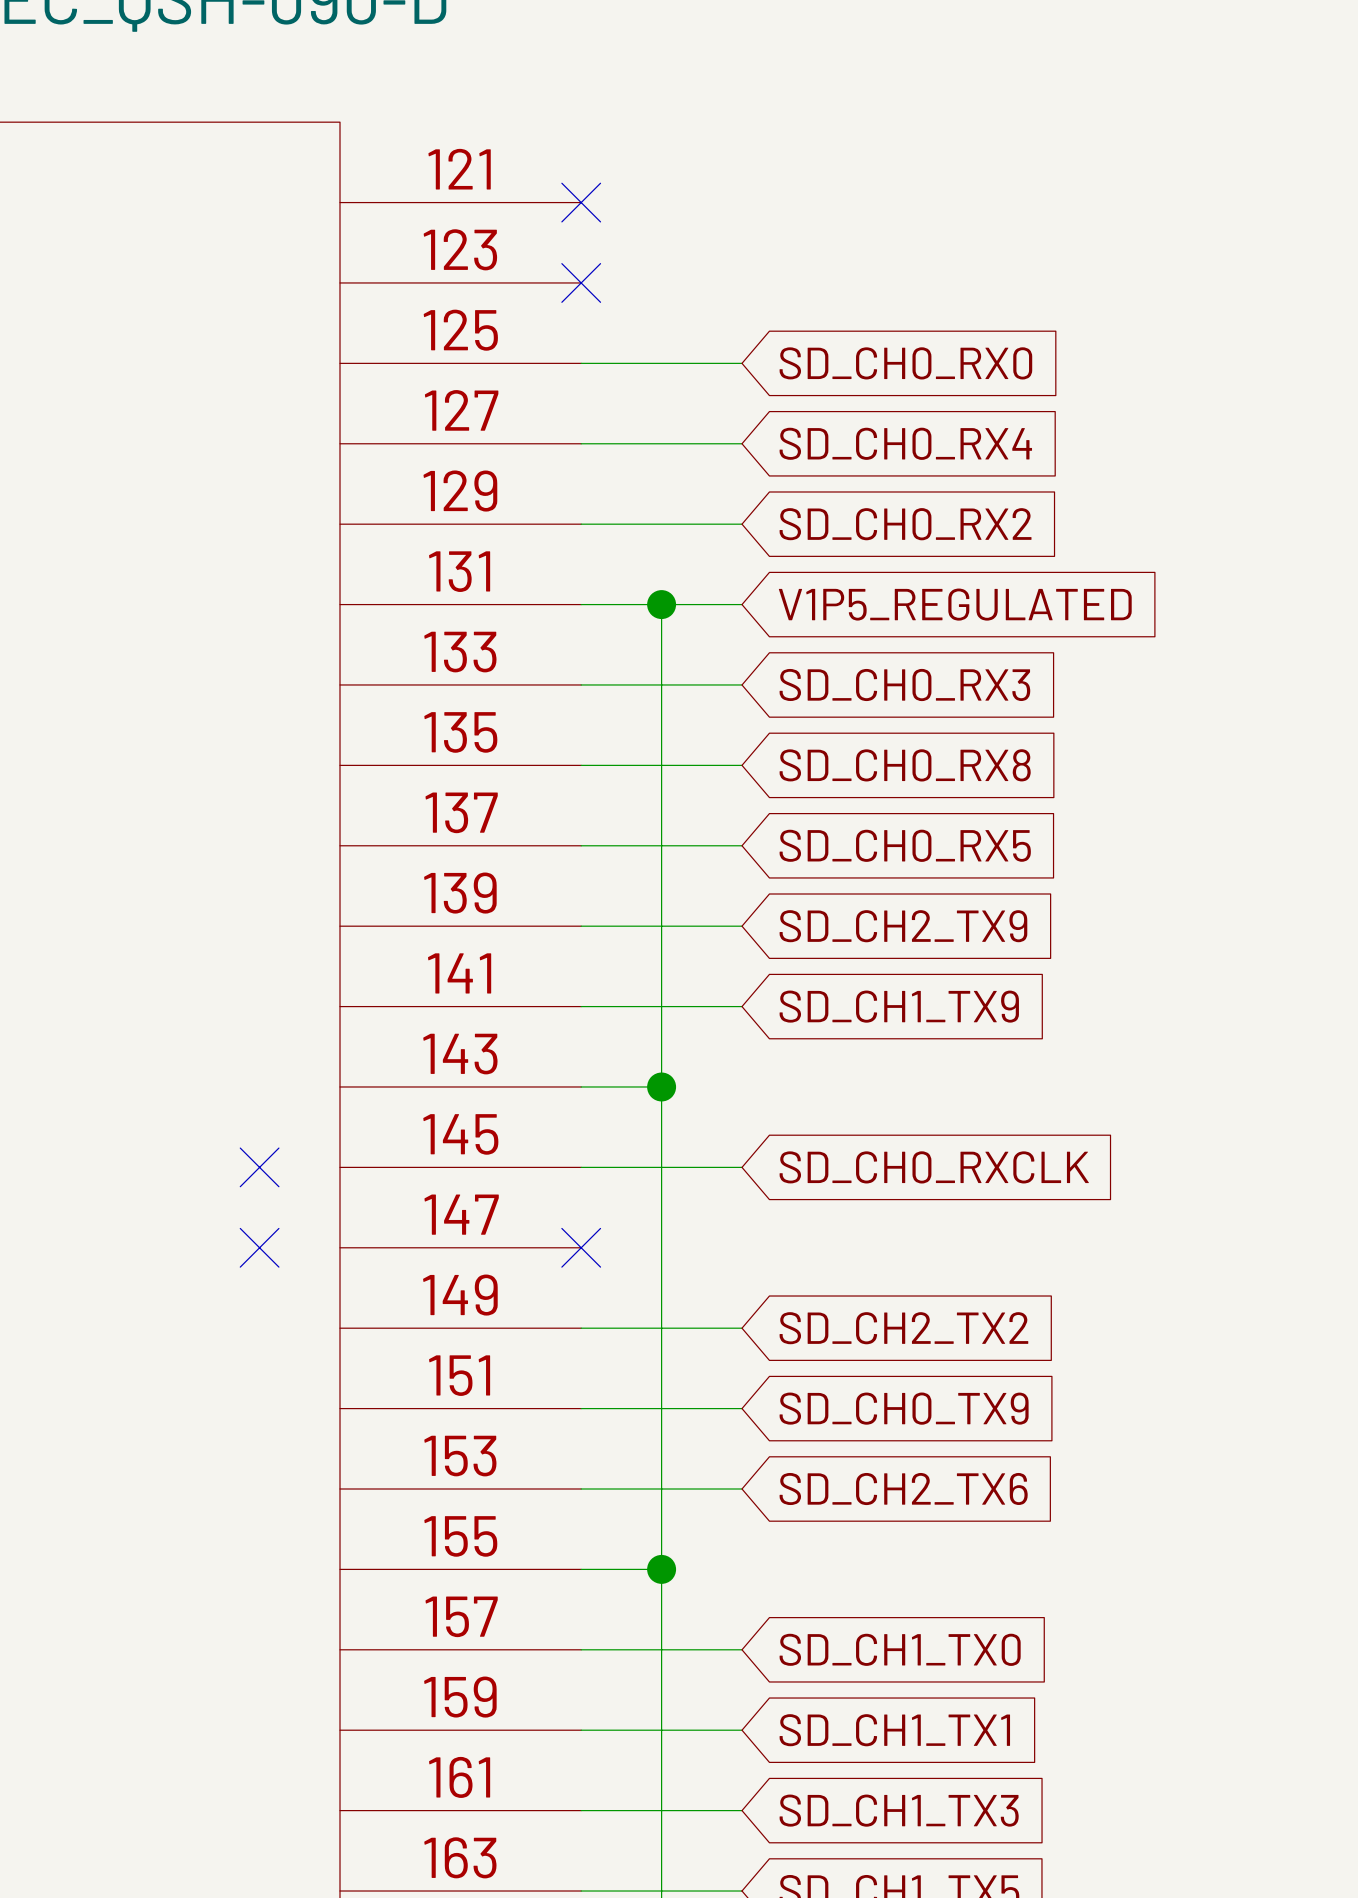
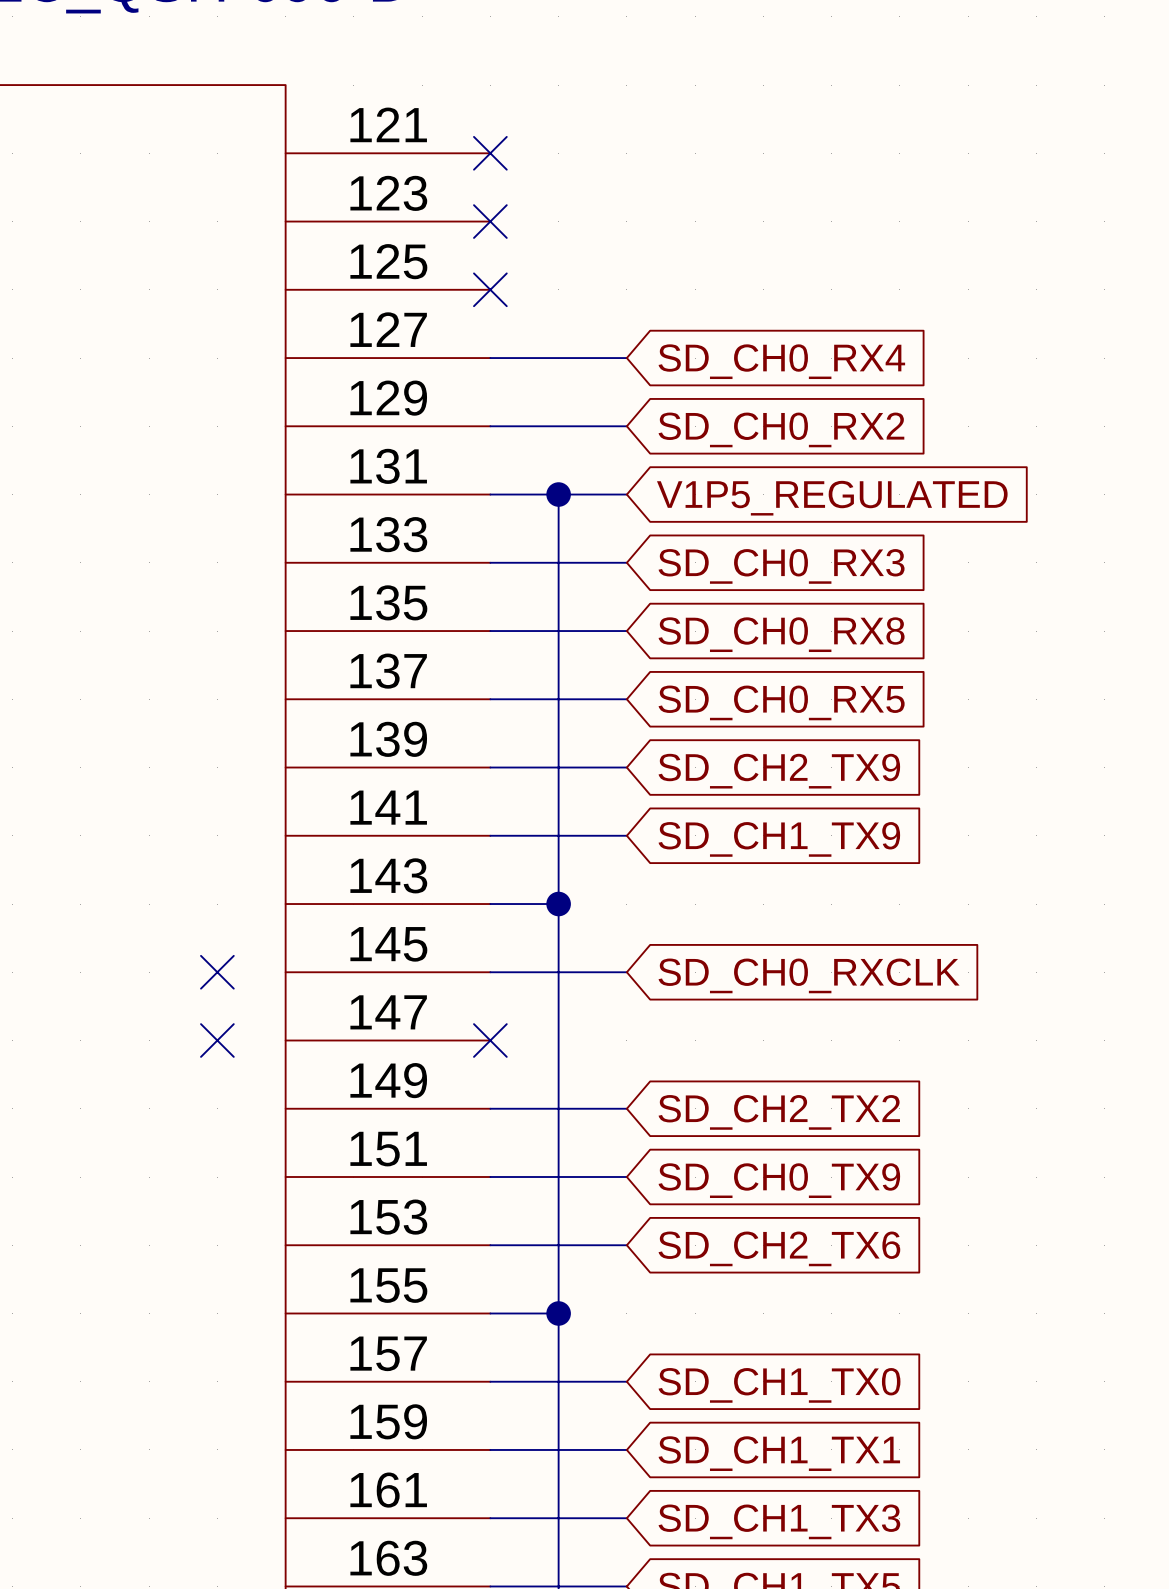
wire: (581, 363) (742, 363) -> none
no-connect mark: none -> (490, 289)
global label: SD_CH0_RX0 (905, 363) -> none

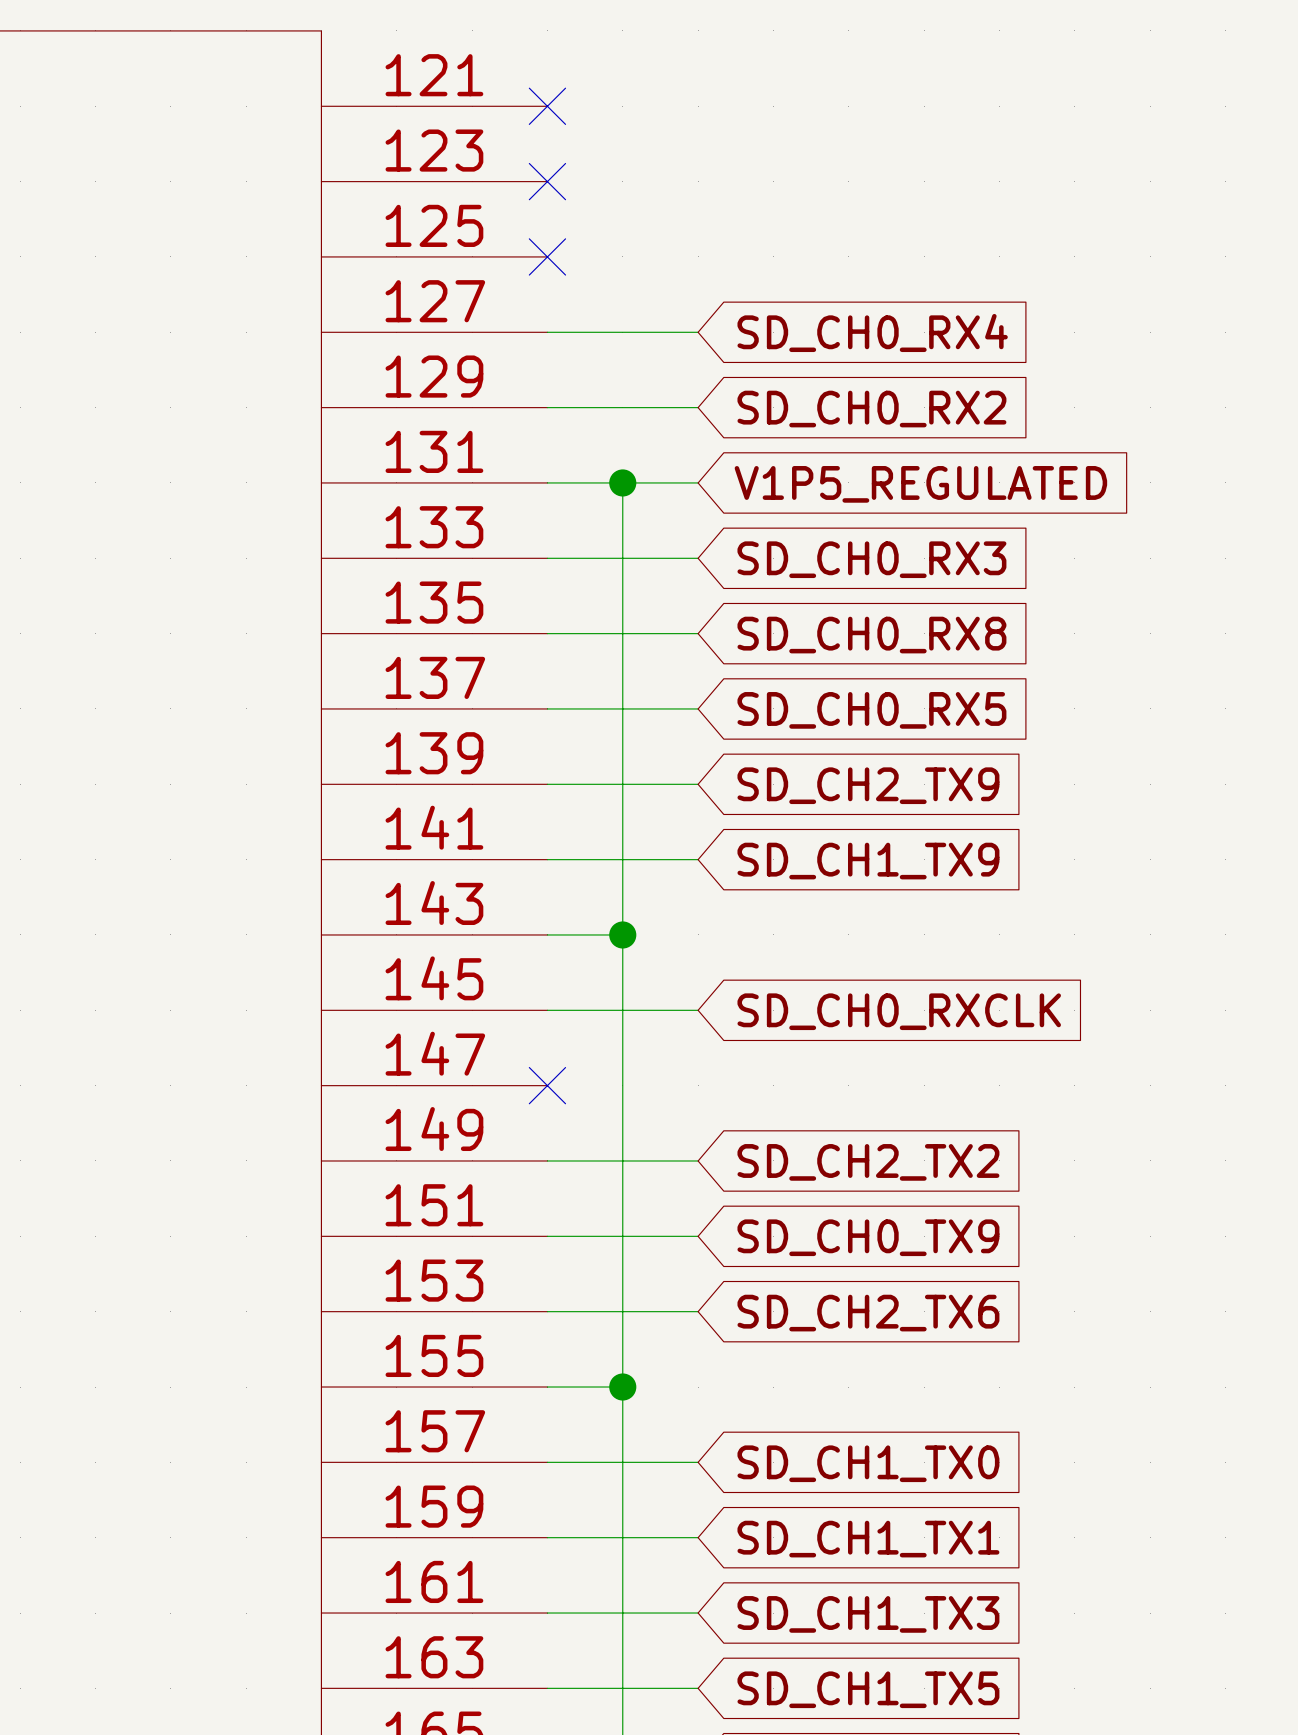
no-connect mark: (217, 972) -> none
no-connect mark: (217, 1040) -> none

